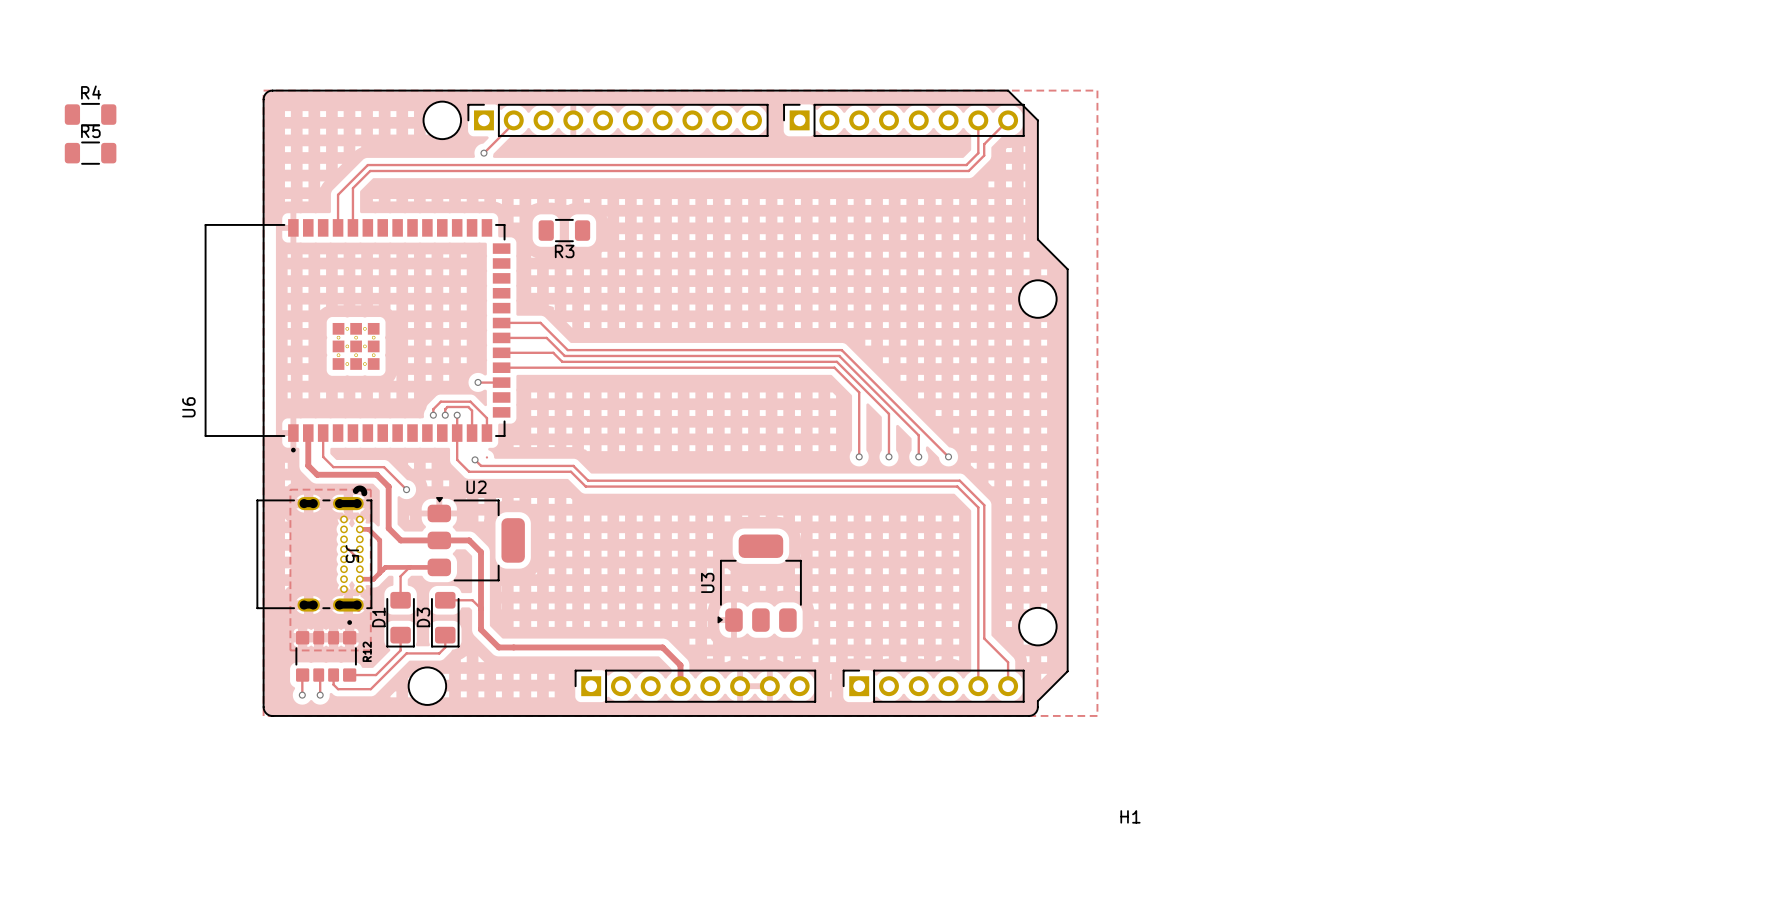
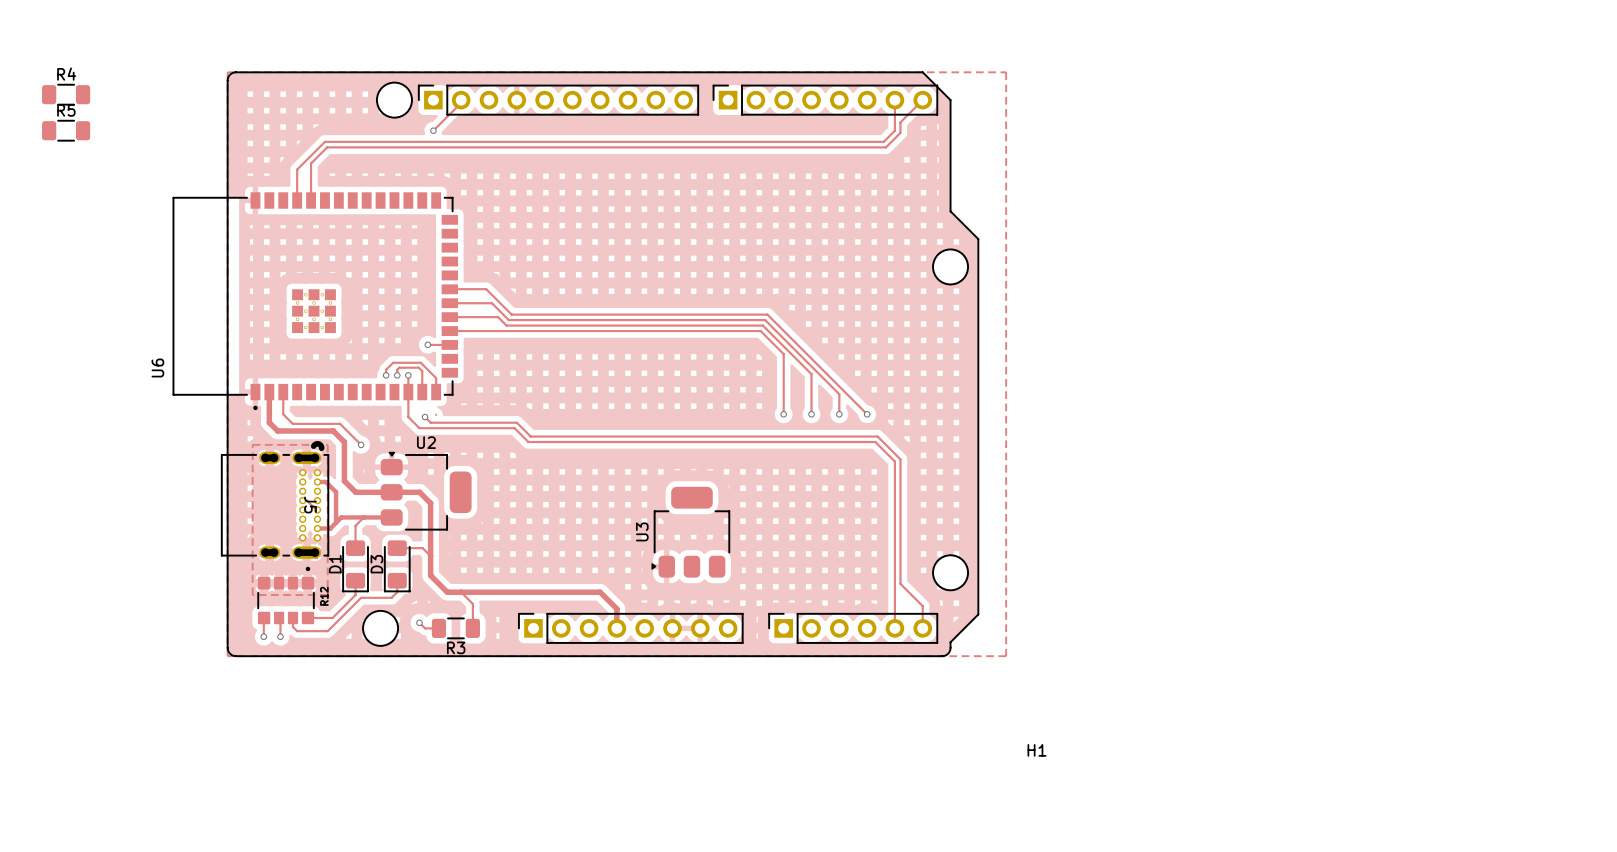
R3 position: (564, 230) -> (455, 628)
track: none -> (461, 592) (472, 603) (472, 628)
track: none -> (419, 622) (425, 628) (438, 628)
via: none -> (419, 622)

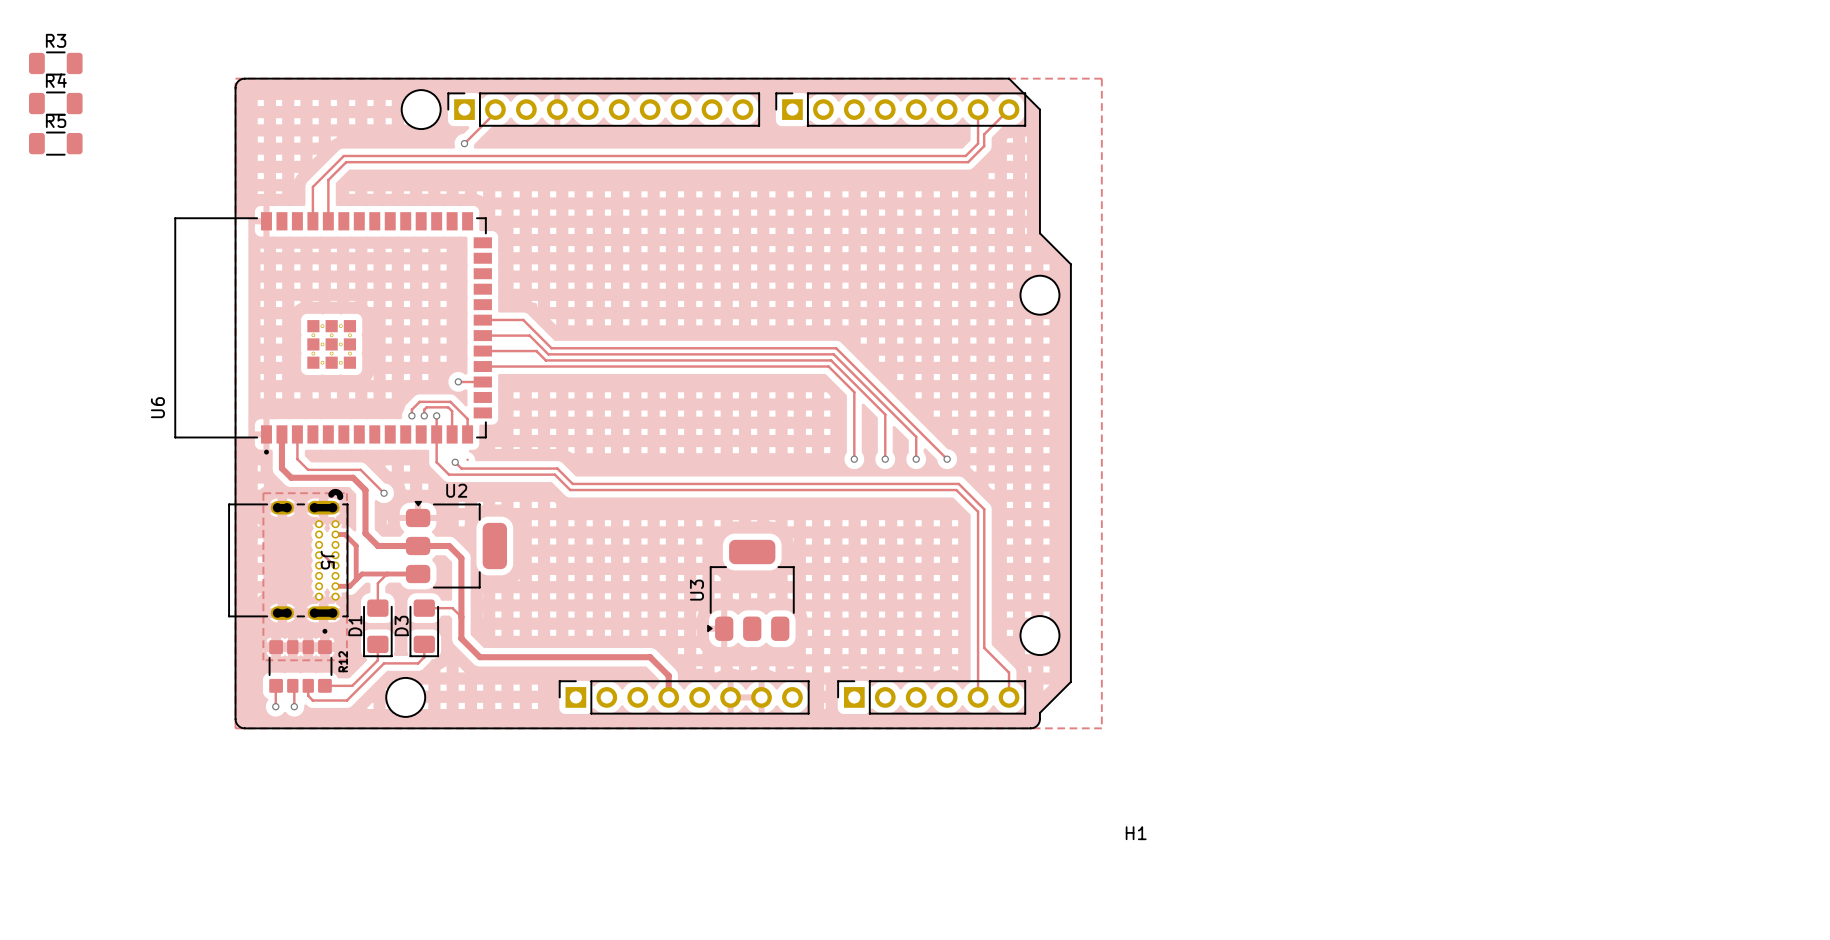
track: (461, 592) (472, 603) (472, 628) -> none
track: (419, 622) (425, 628) (438, 628) -> none
via: (419, 622) -> none
R3 position: (455, 628) -> (55, 63)
R3 name position: R3 (456, 647) -> R3 (56, 40)

